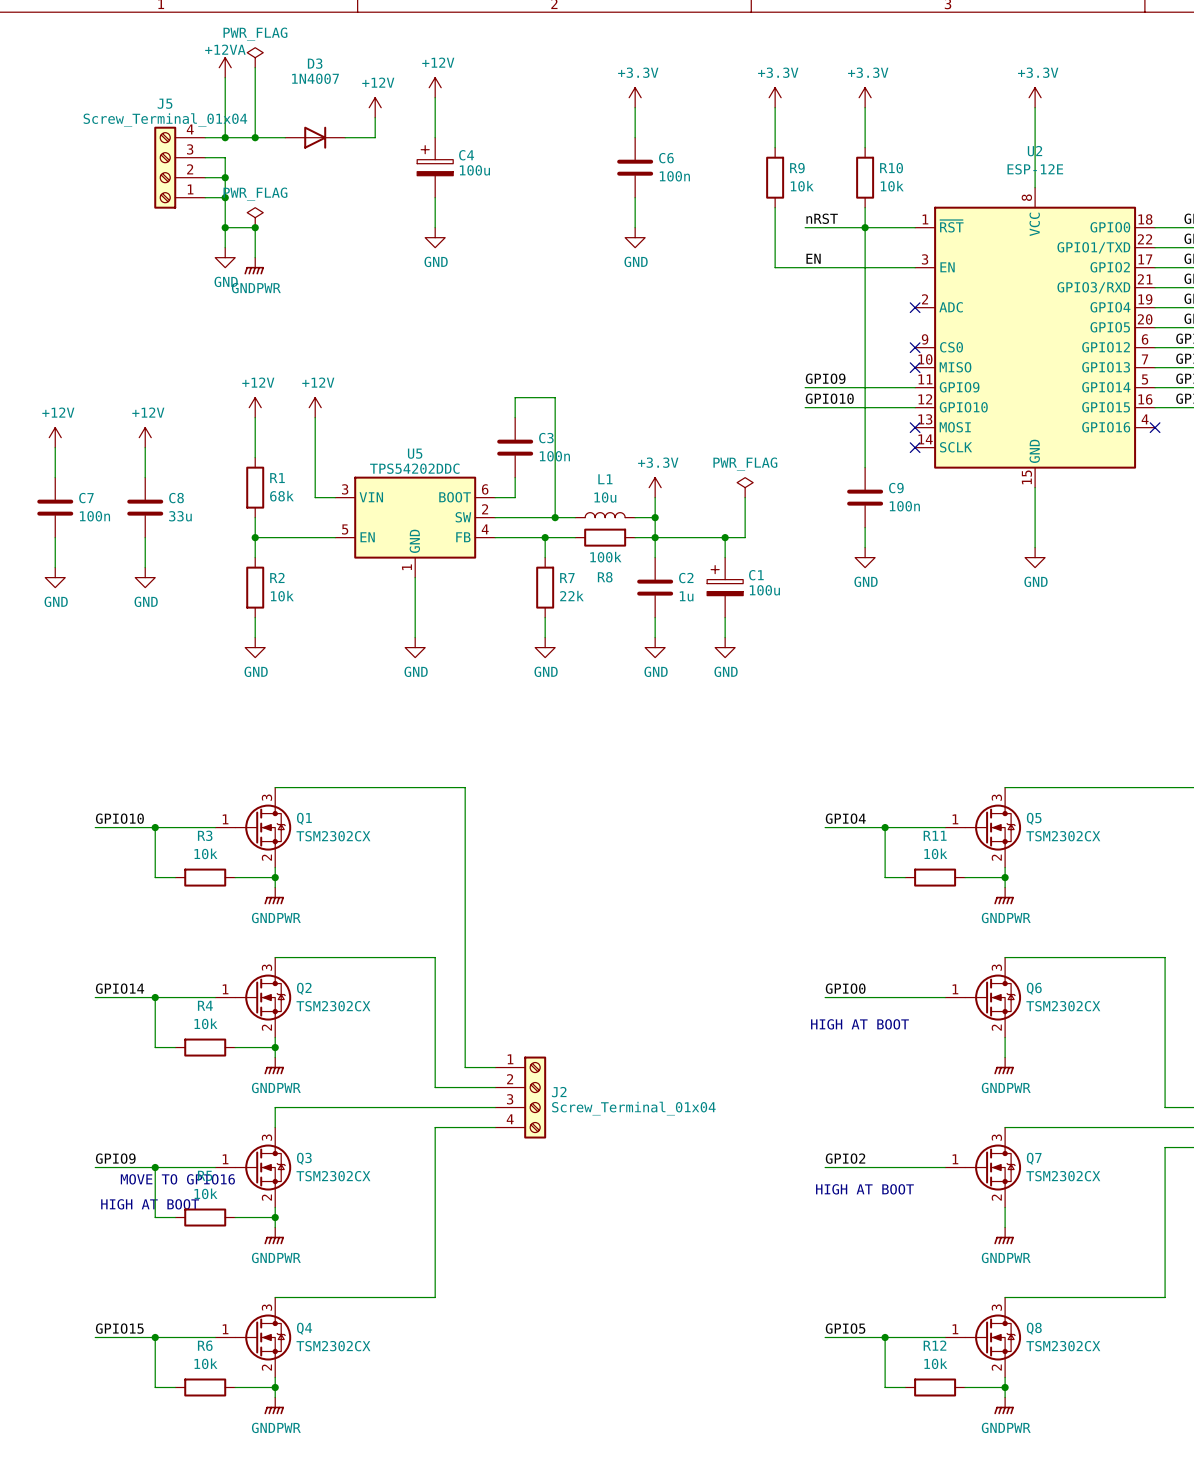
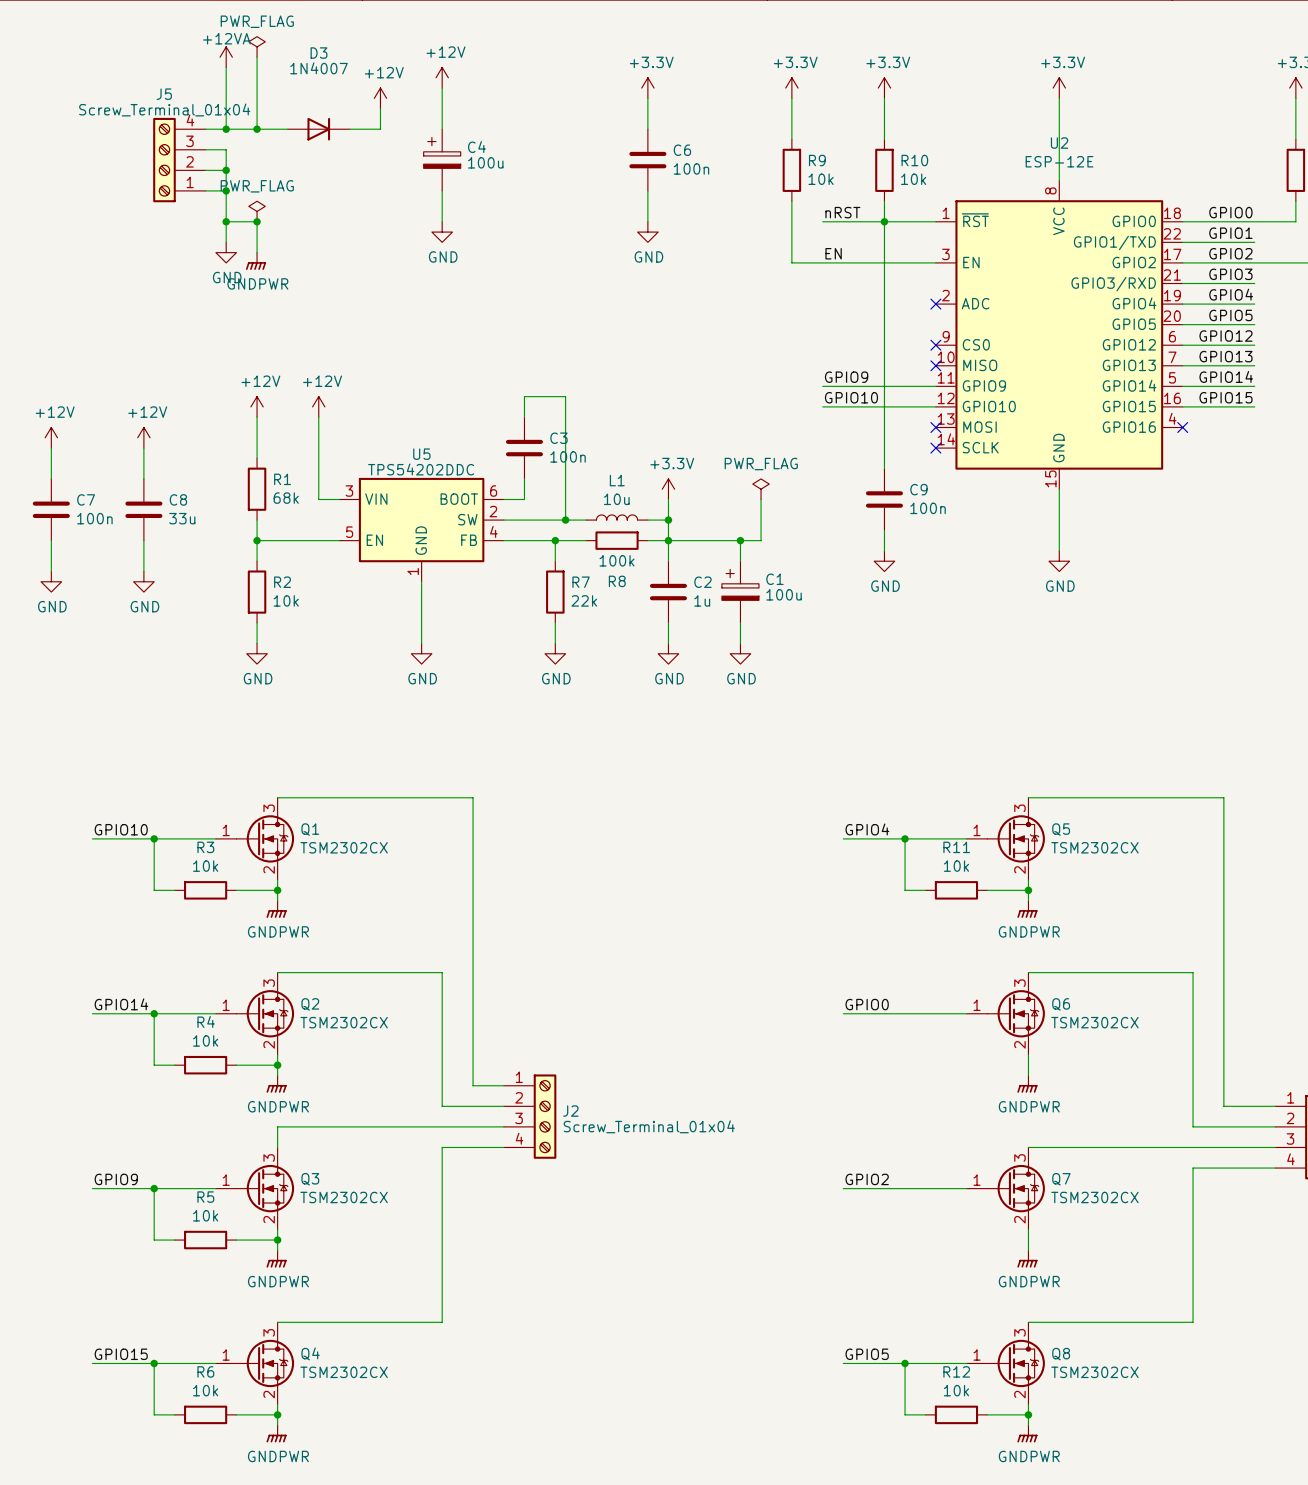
text: HIGH AT BOOT (859, 1024) -> none
text: MOVE TO GPIO16 (177, 1179) -> none
text: HIGH AT BOOT (864, 1189) -> none
text: HIGH AT BOOT (150, 1204) -> none

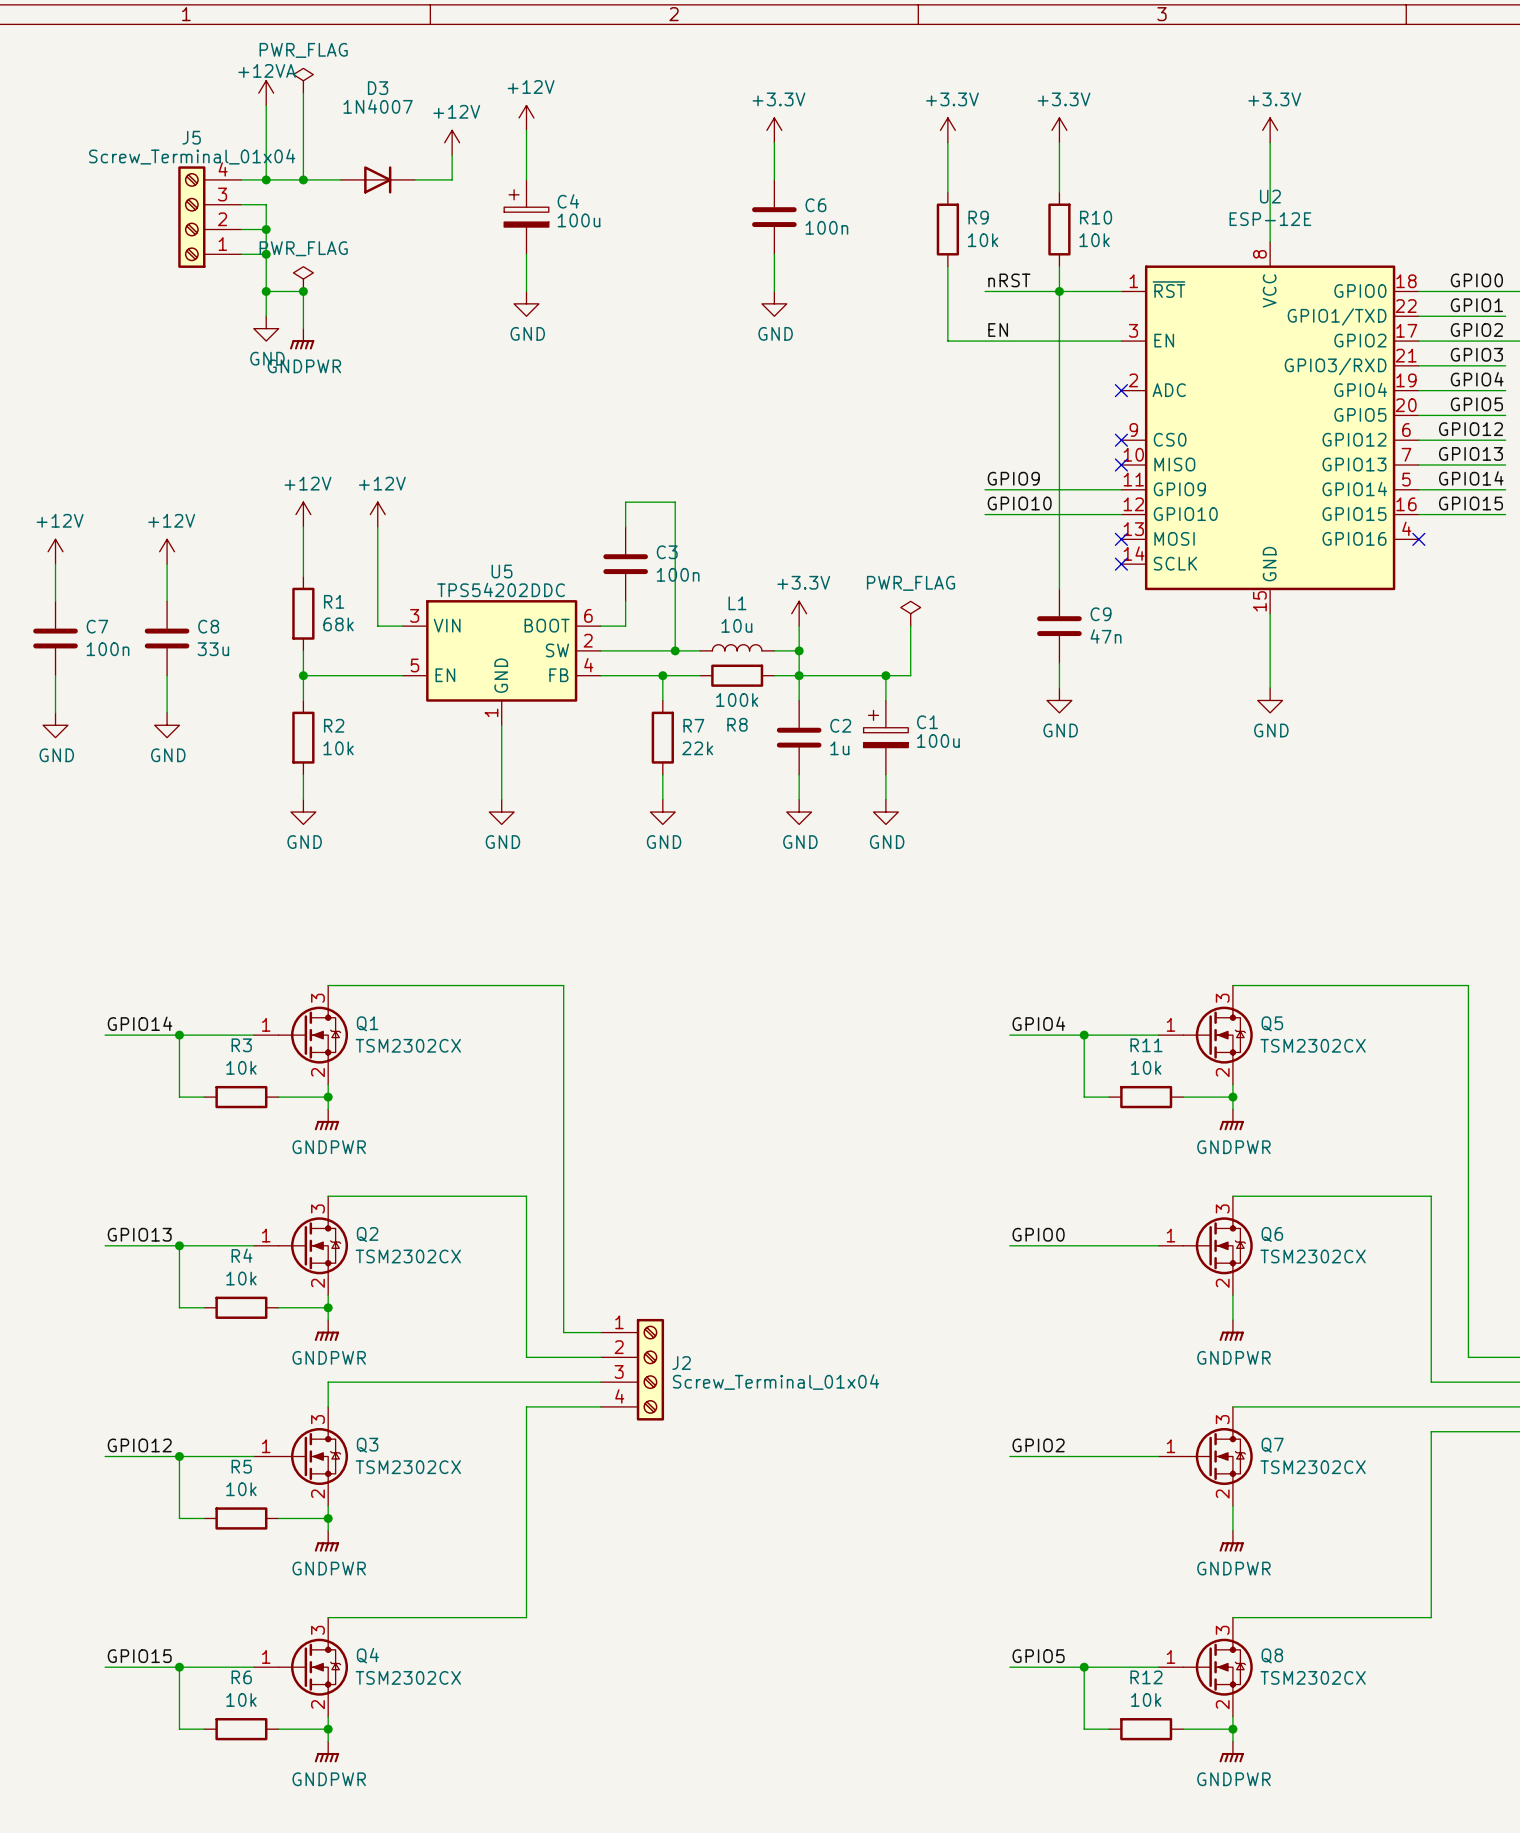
C9 value: 100n (928, 508) -> 47n (1106, 636)
label: GPIO10 (121, 829) -> GPIO14 (140, 1023)
label: GPIO14 (121, 1004) -> GPIO13 (139, 1234)
label: GPIO9 (116, 1179) -> GPIO12 (139, 1445)

